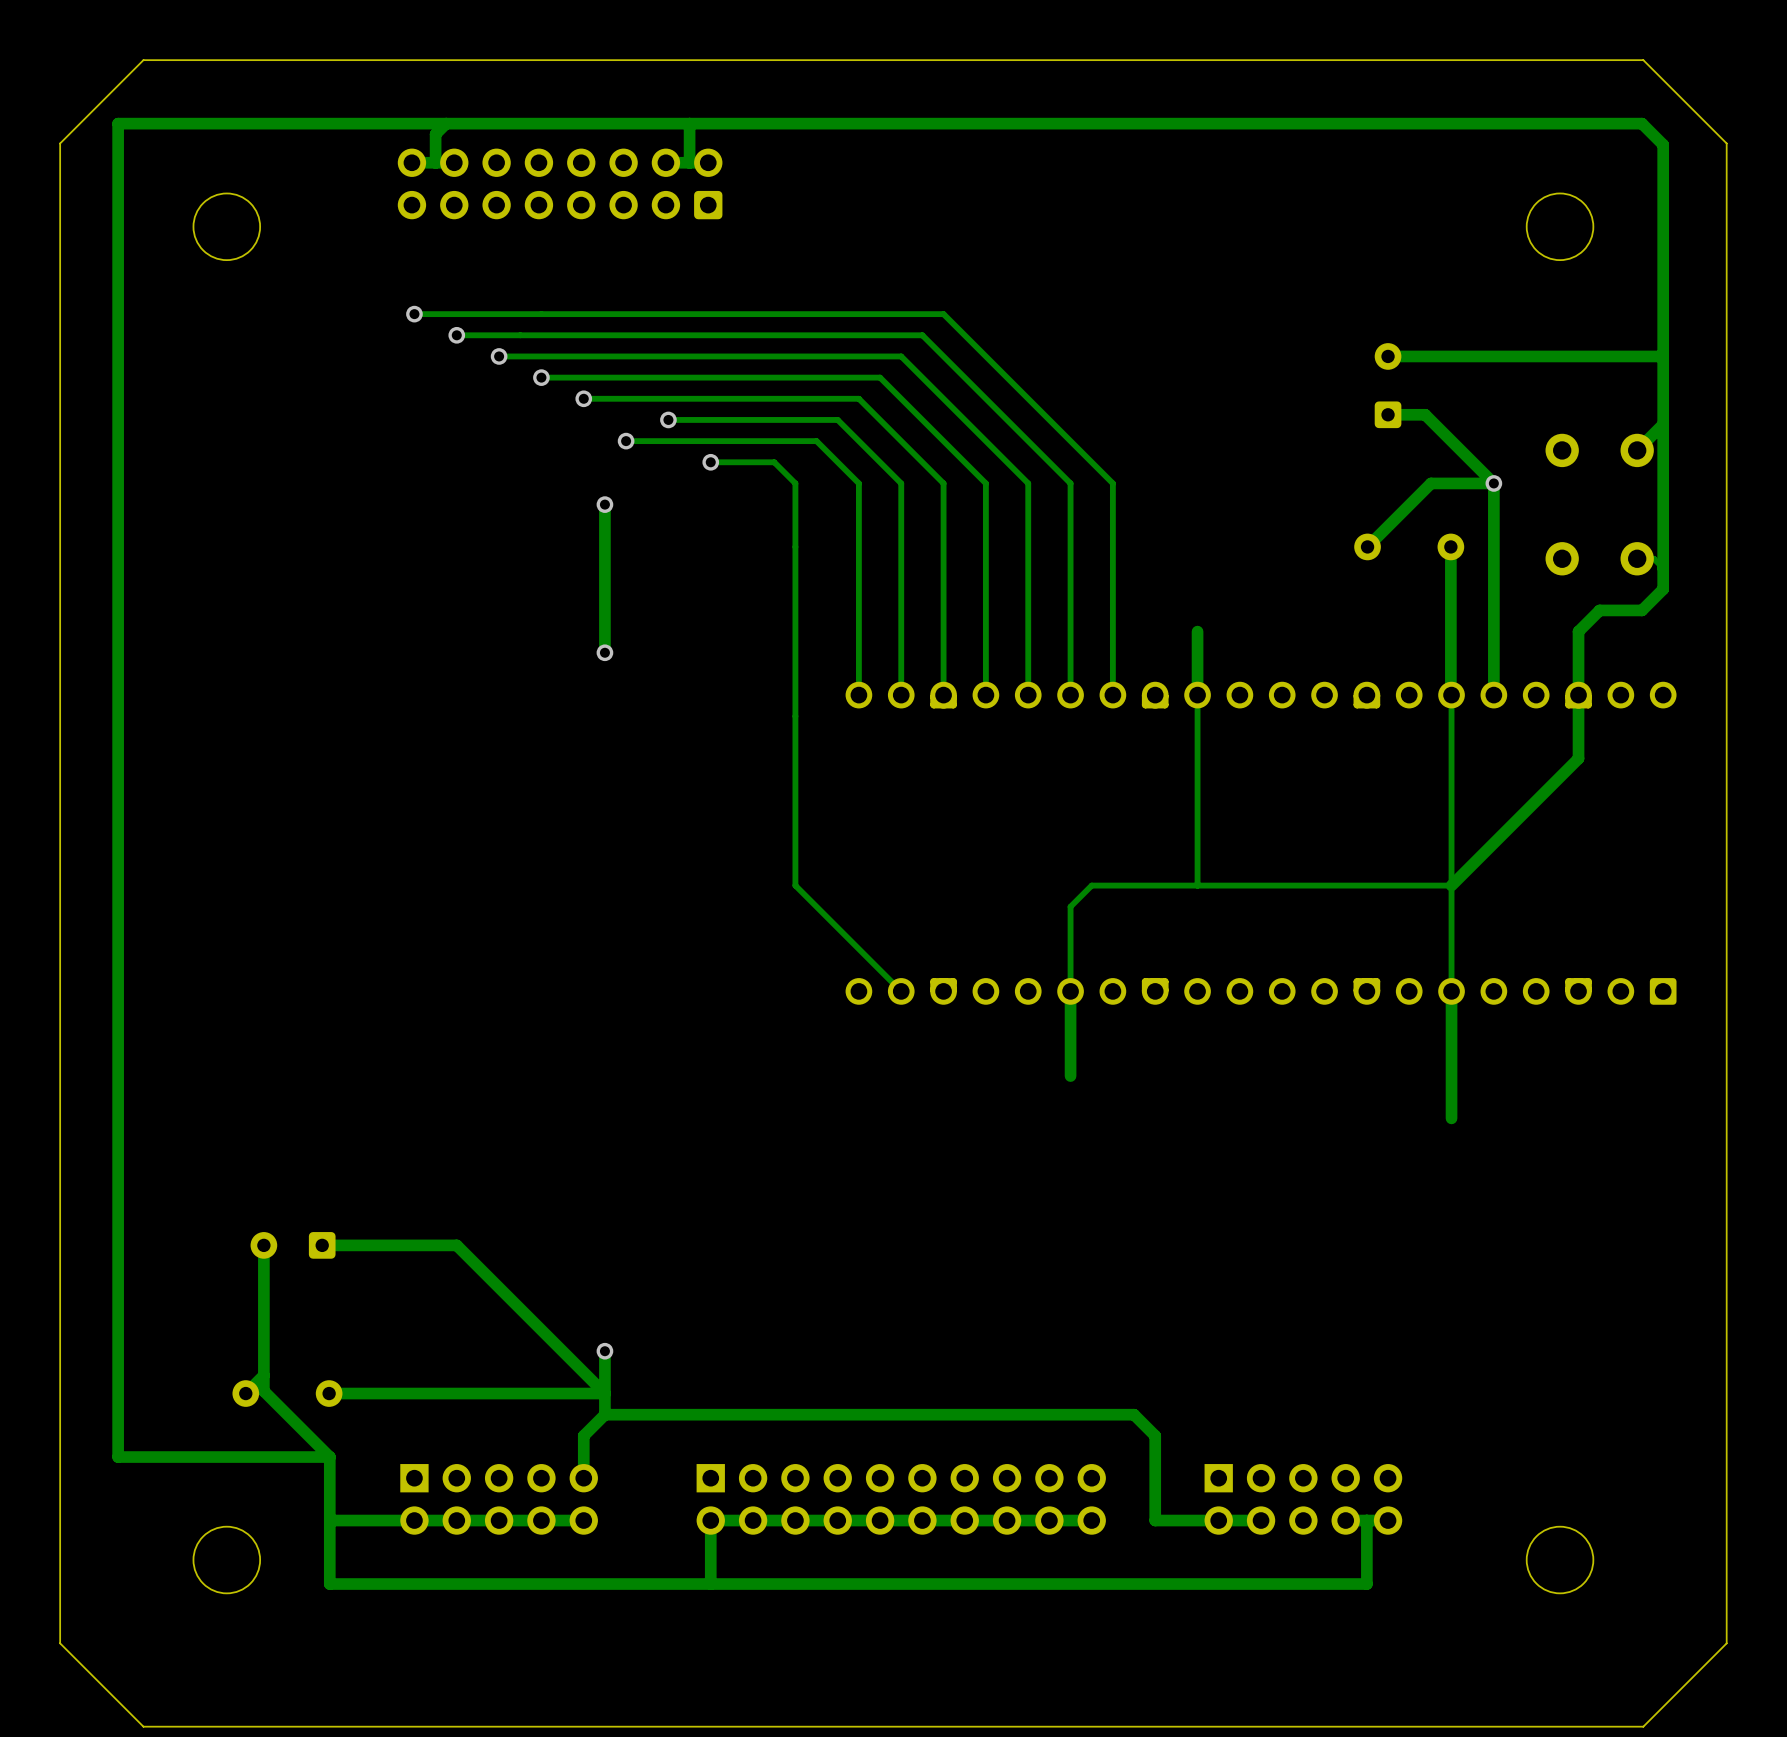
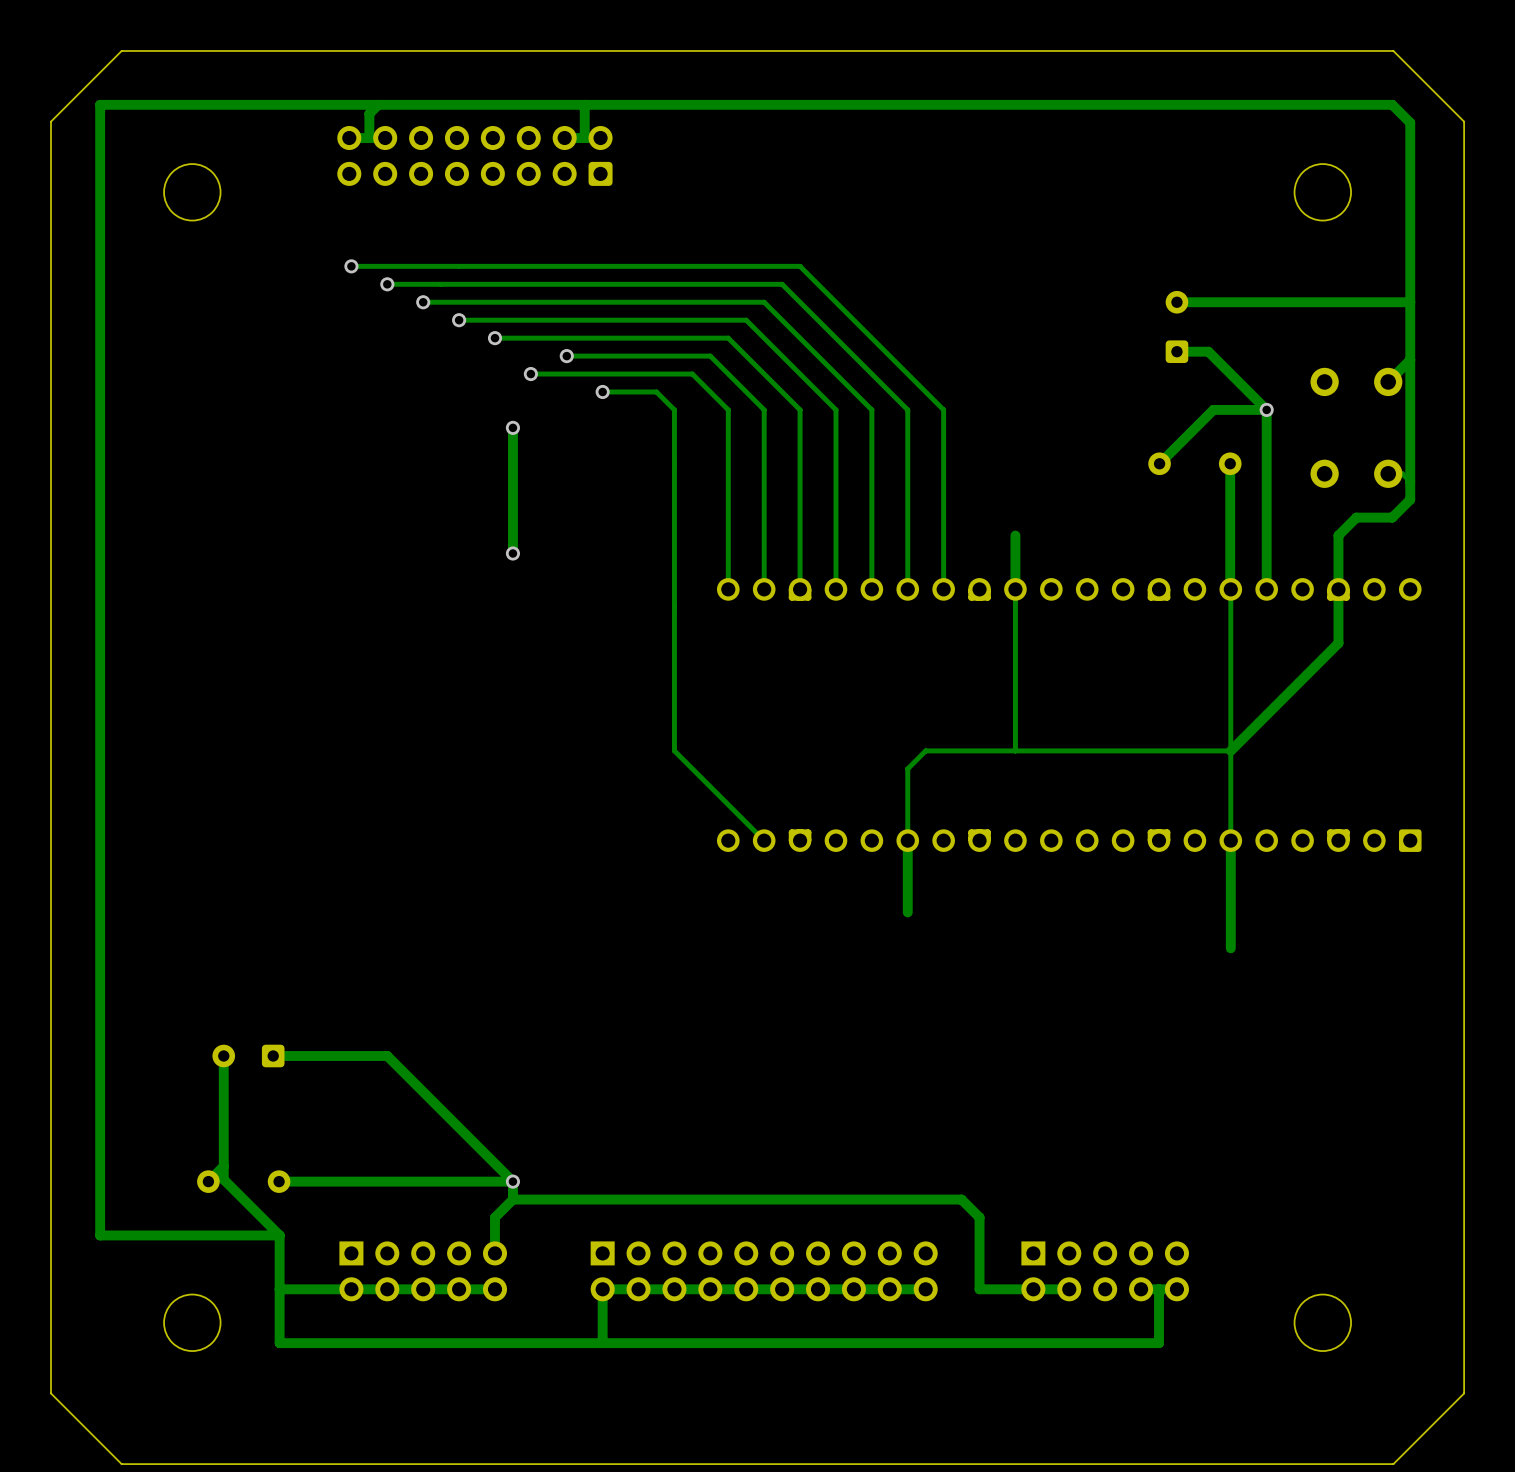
track: (604, 1351) (604, 1393) -> none
via position: (604, 1351) -> (512, 1181)

